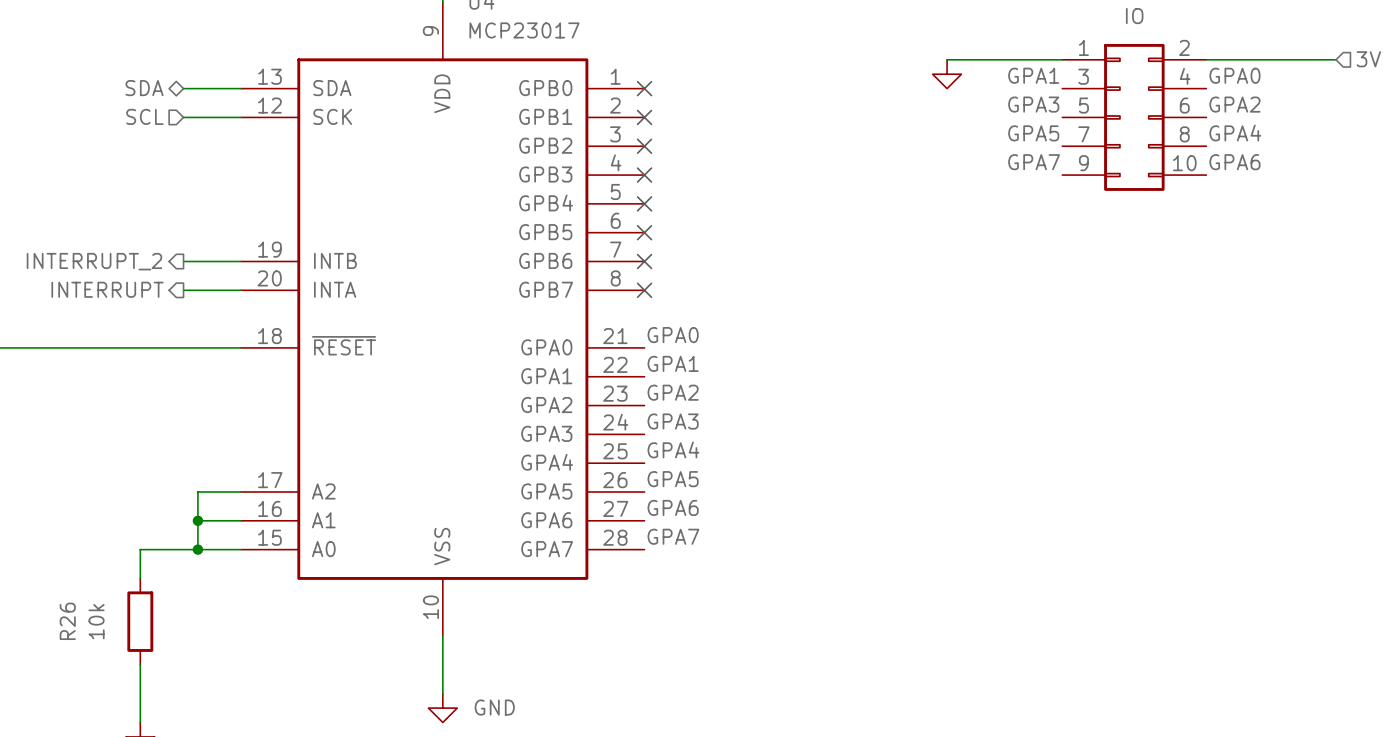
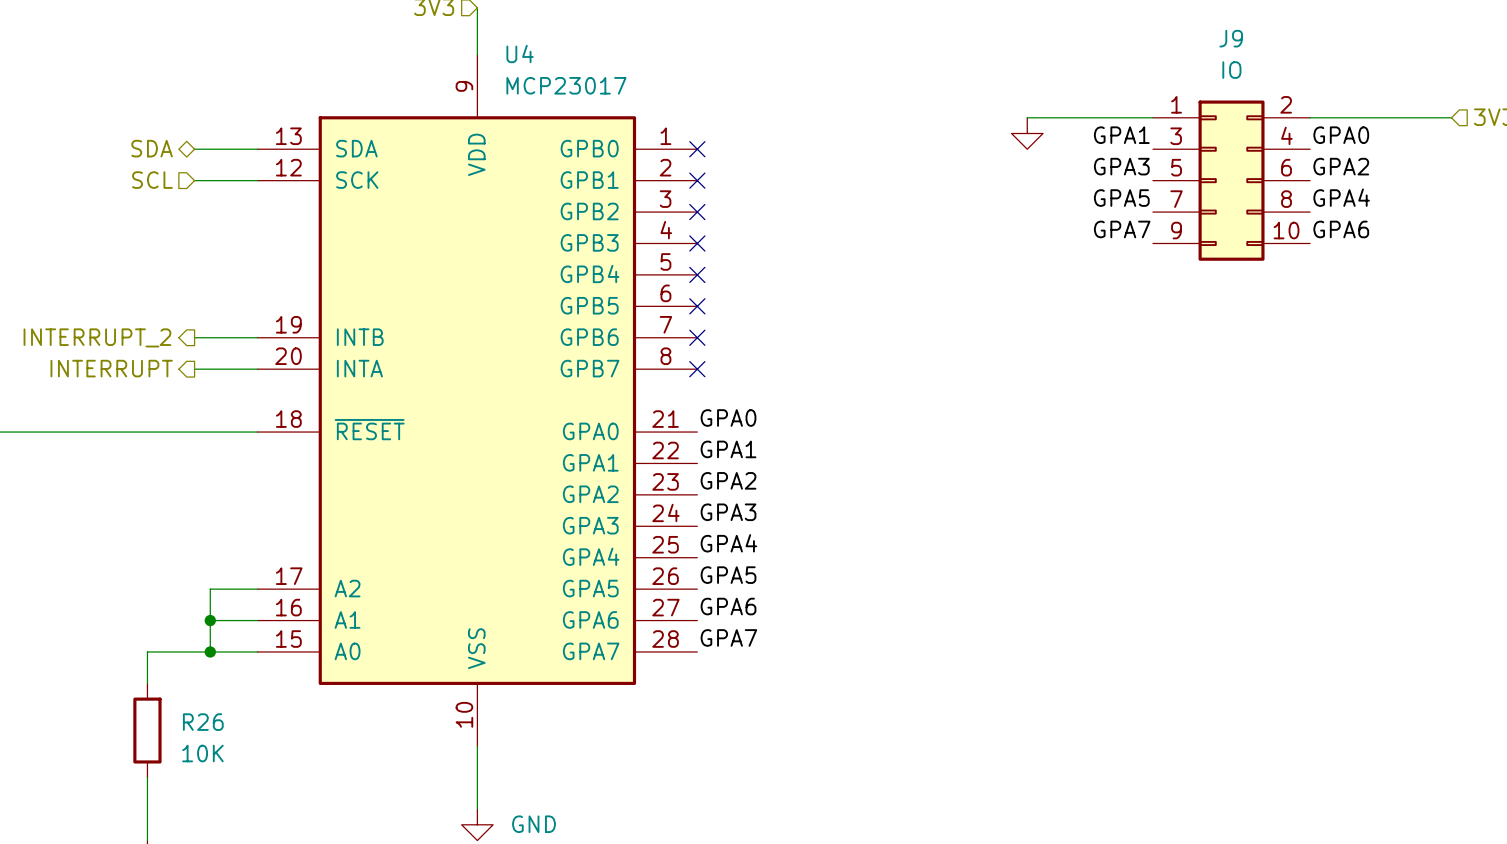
R26 name rotation: 0° (67, 621) -> 90° clockwise (203, 722)
R26 name position: R26 (67, 621) -> R26 (203, 722)
R26 value: 10k (96, 621) -> 10K (202, 753)

